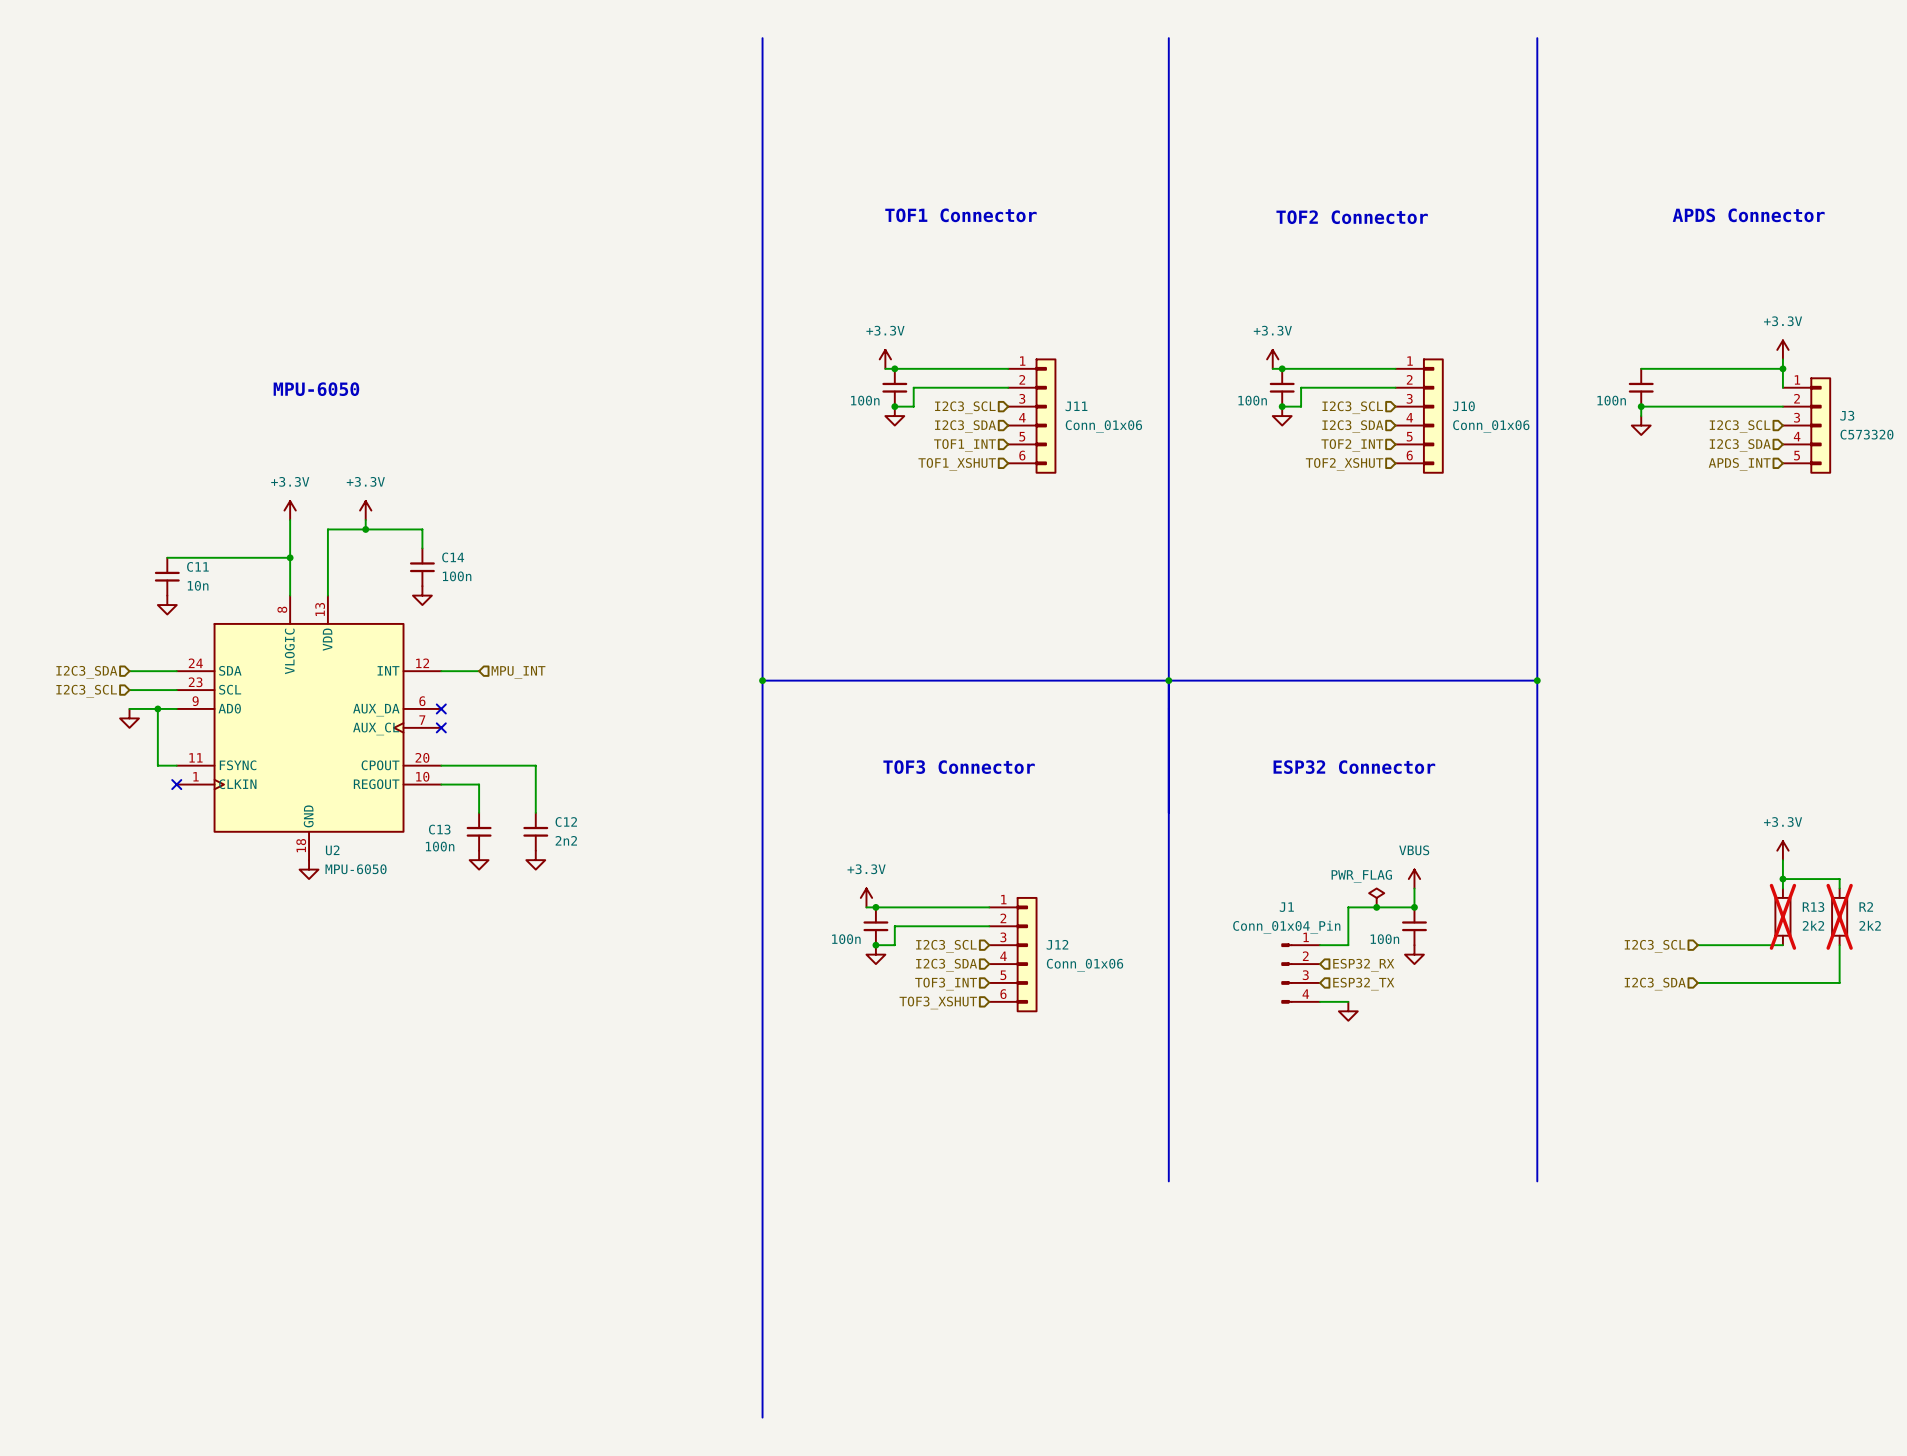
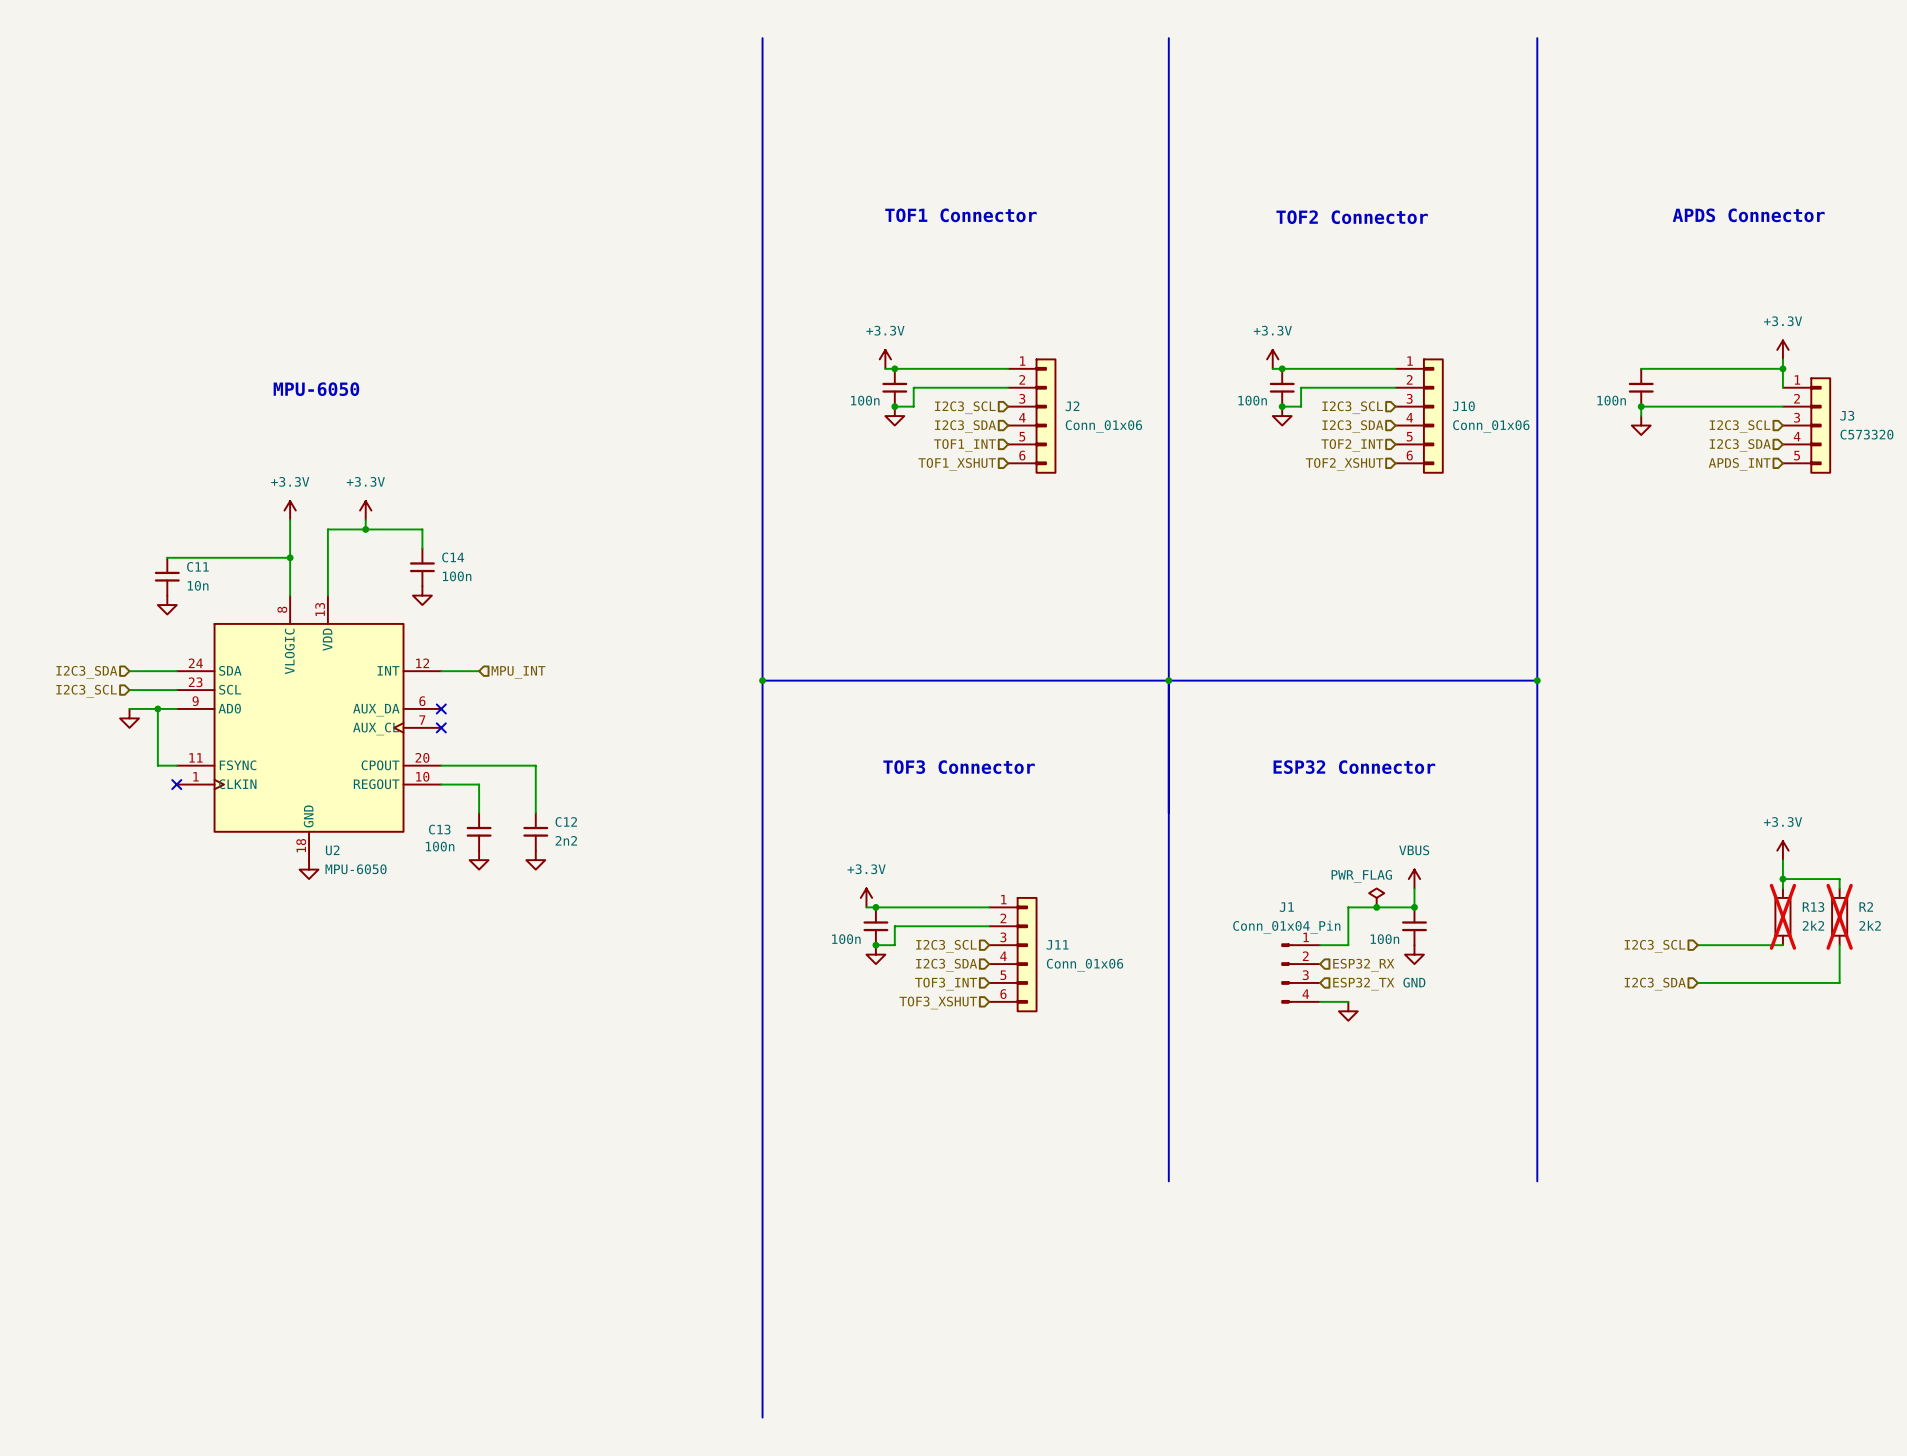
J11 name: J11 (1076, 406) -> J2 (1072, 406)
J12 name: J12 (1057, 944) -> J11 (1057, 944)
power symbol text: none -> GND (1414, 982)

